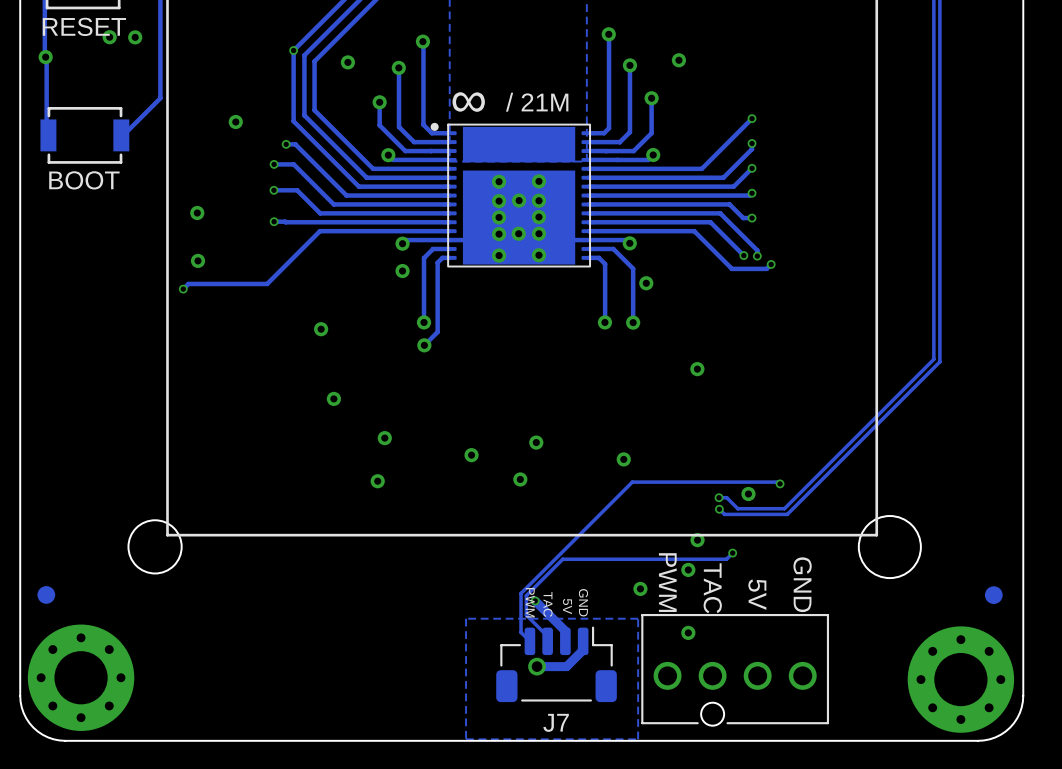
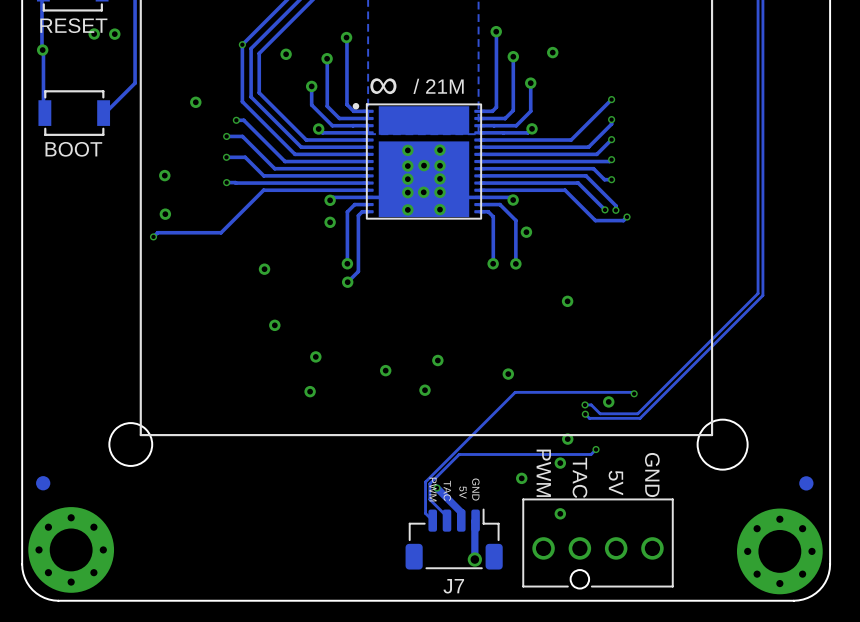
zone outline: (638, 618) (638, 739) (466, 739) (466, 618) (638, 618) -> none
track: (583, 641) (583, 650) (566, 666) (537, 666) -> (475, 520) (474, 559)
via position: (537, 666) -> (474, 559)

